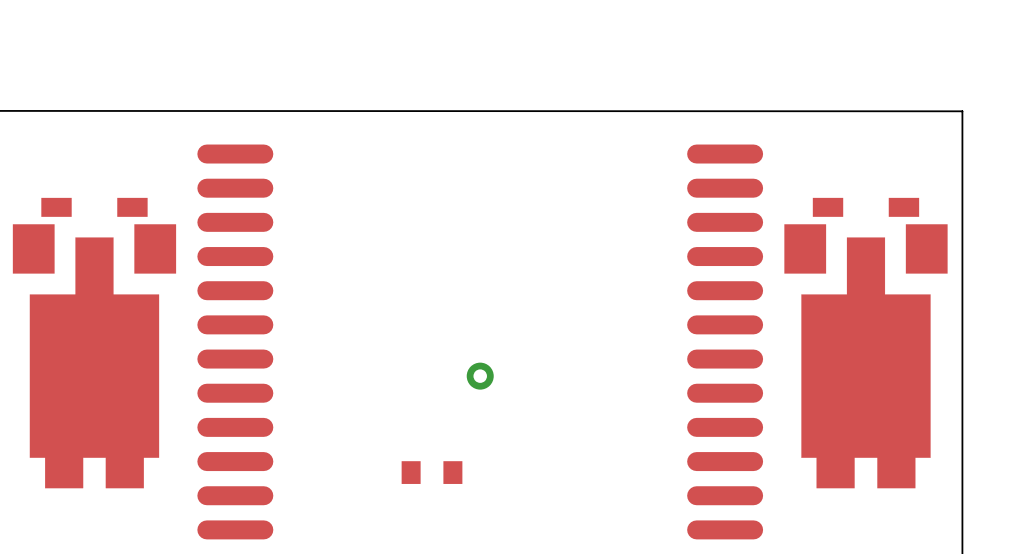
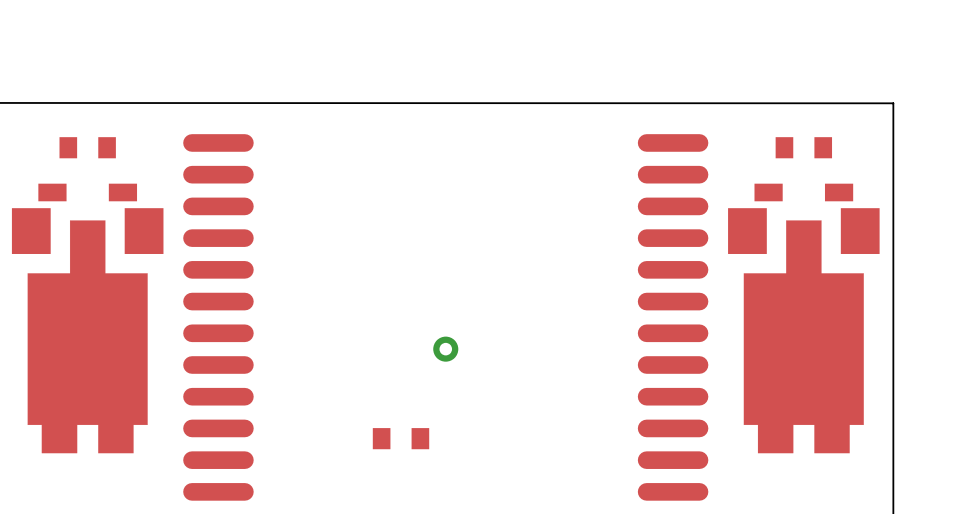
part: none -> (87, 147)
part: none -> (803, 147)

